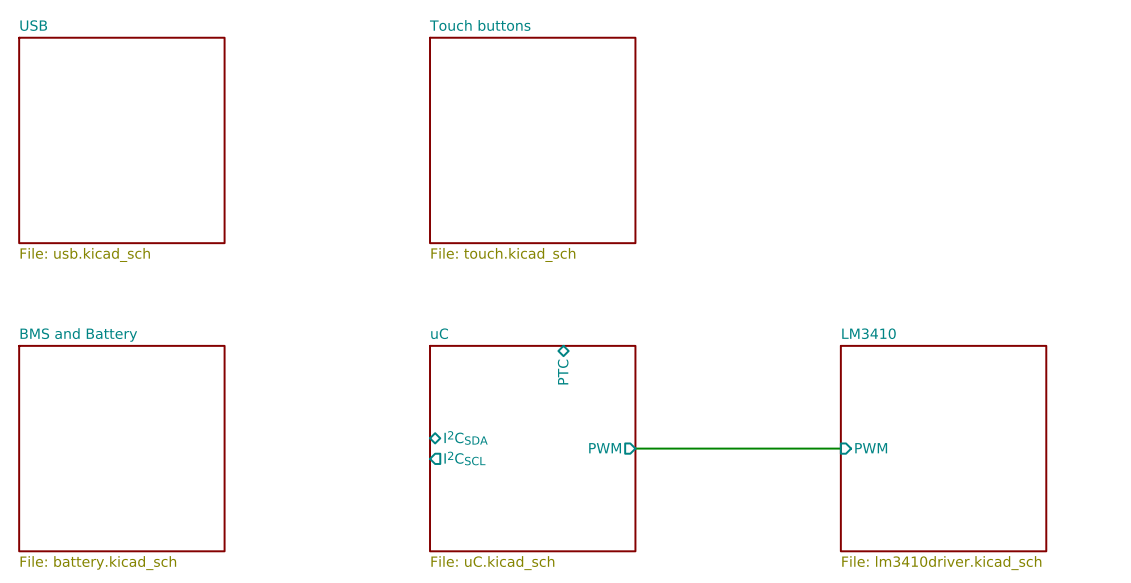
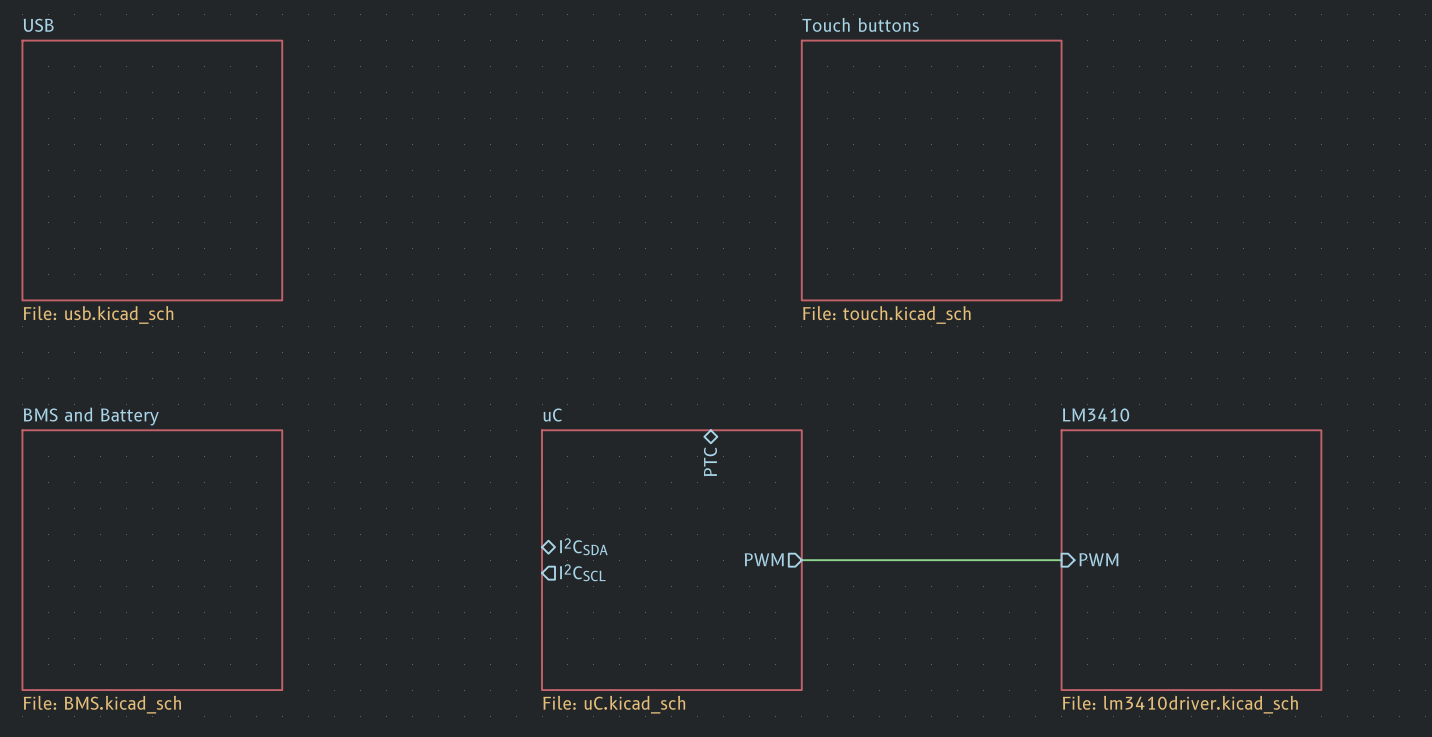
sheet Touch buttons: File: touch.kicad_sch (532, 140) -> none
sheet Touch buttons: none -> File: touch.kicad_sch (931, 170)
sheet BMS and Battery value: File: battery.kicad_sch (98, 563) -> File: BMS.kicad_sch (102, 704)

